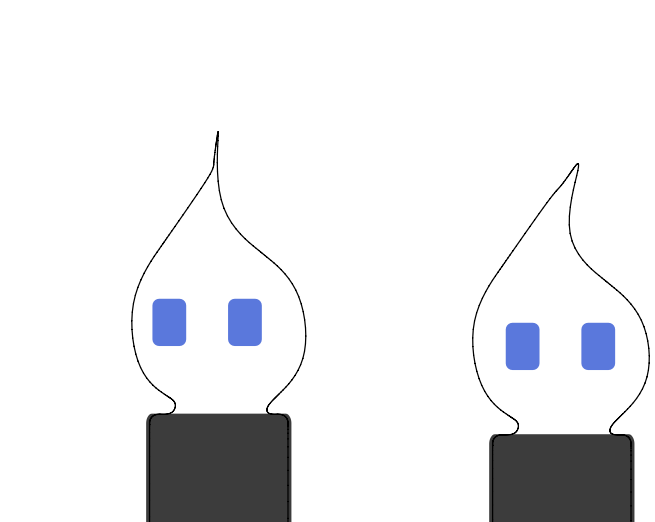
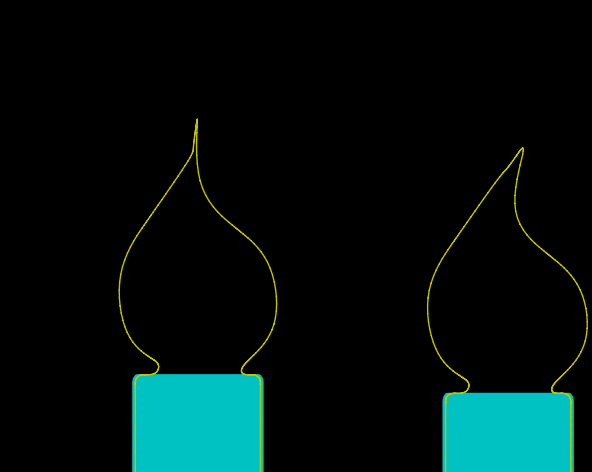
part: (207, 322) -> none
part: (560, 346) -> none

